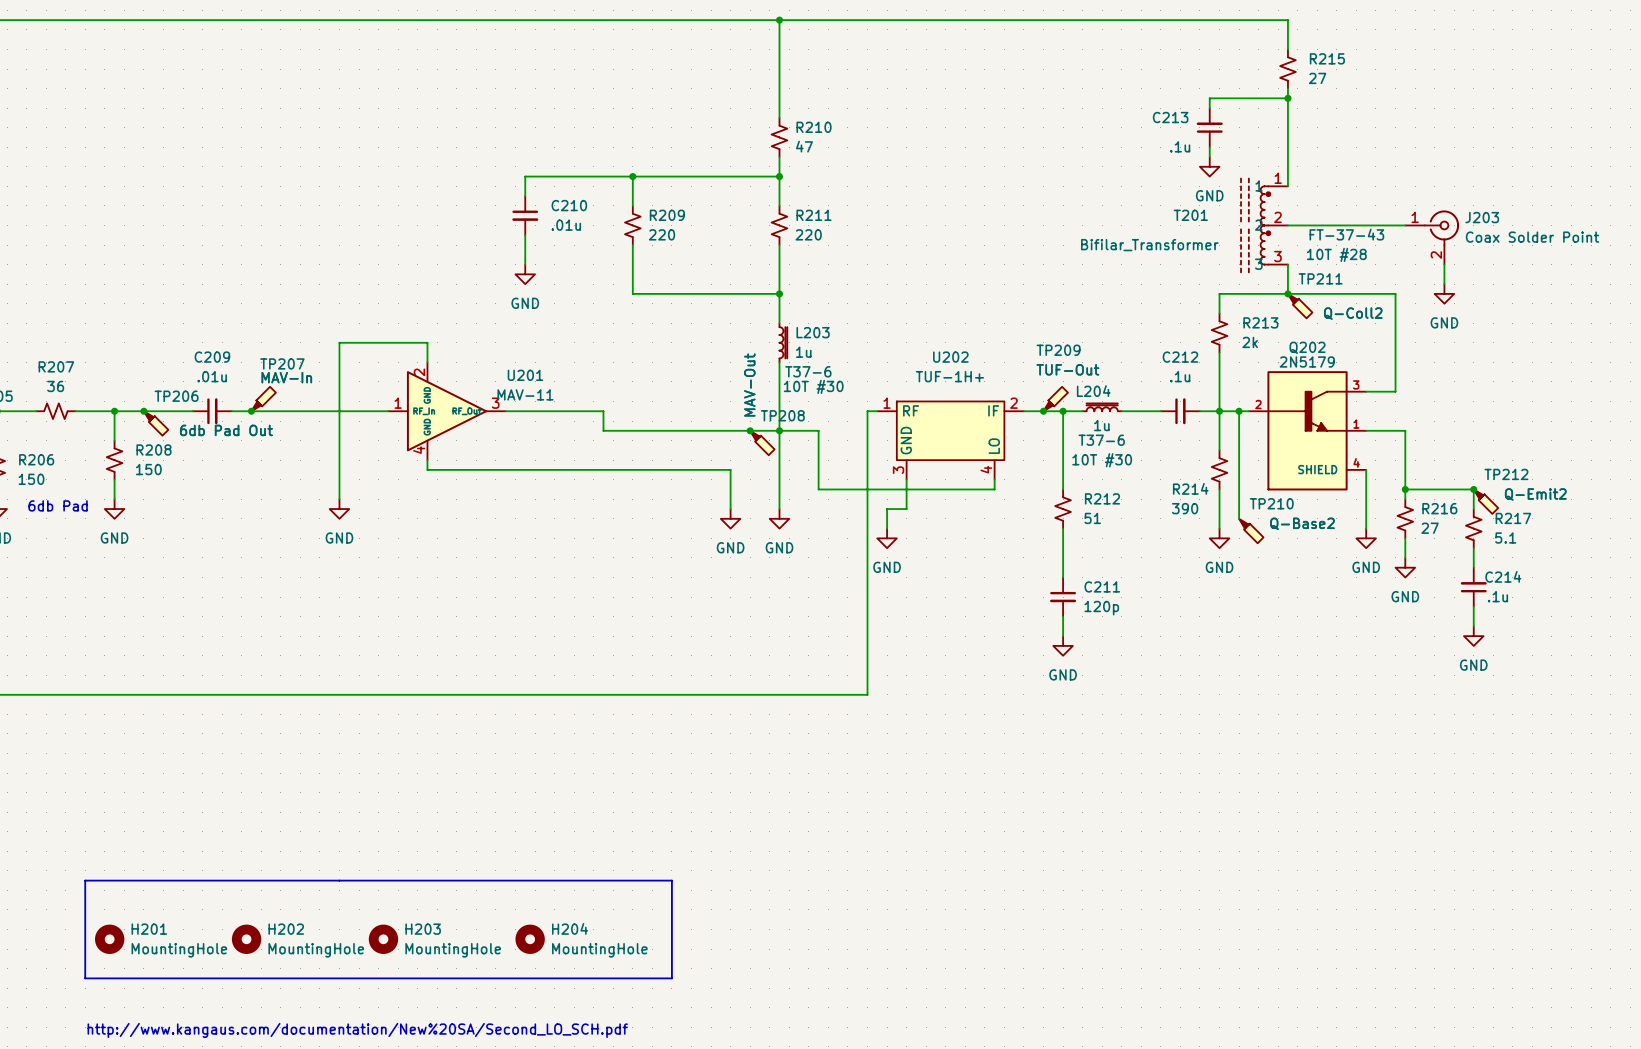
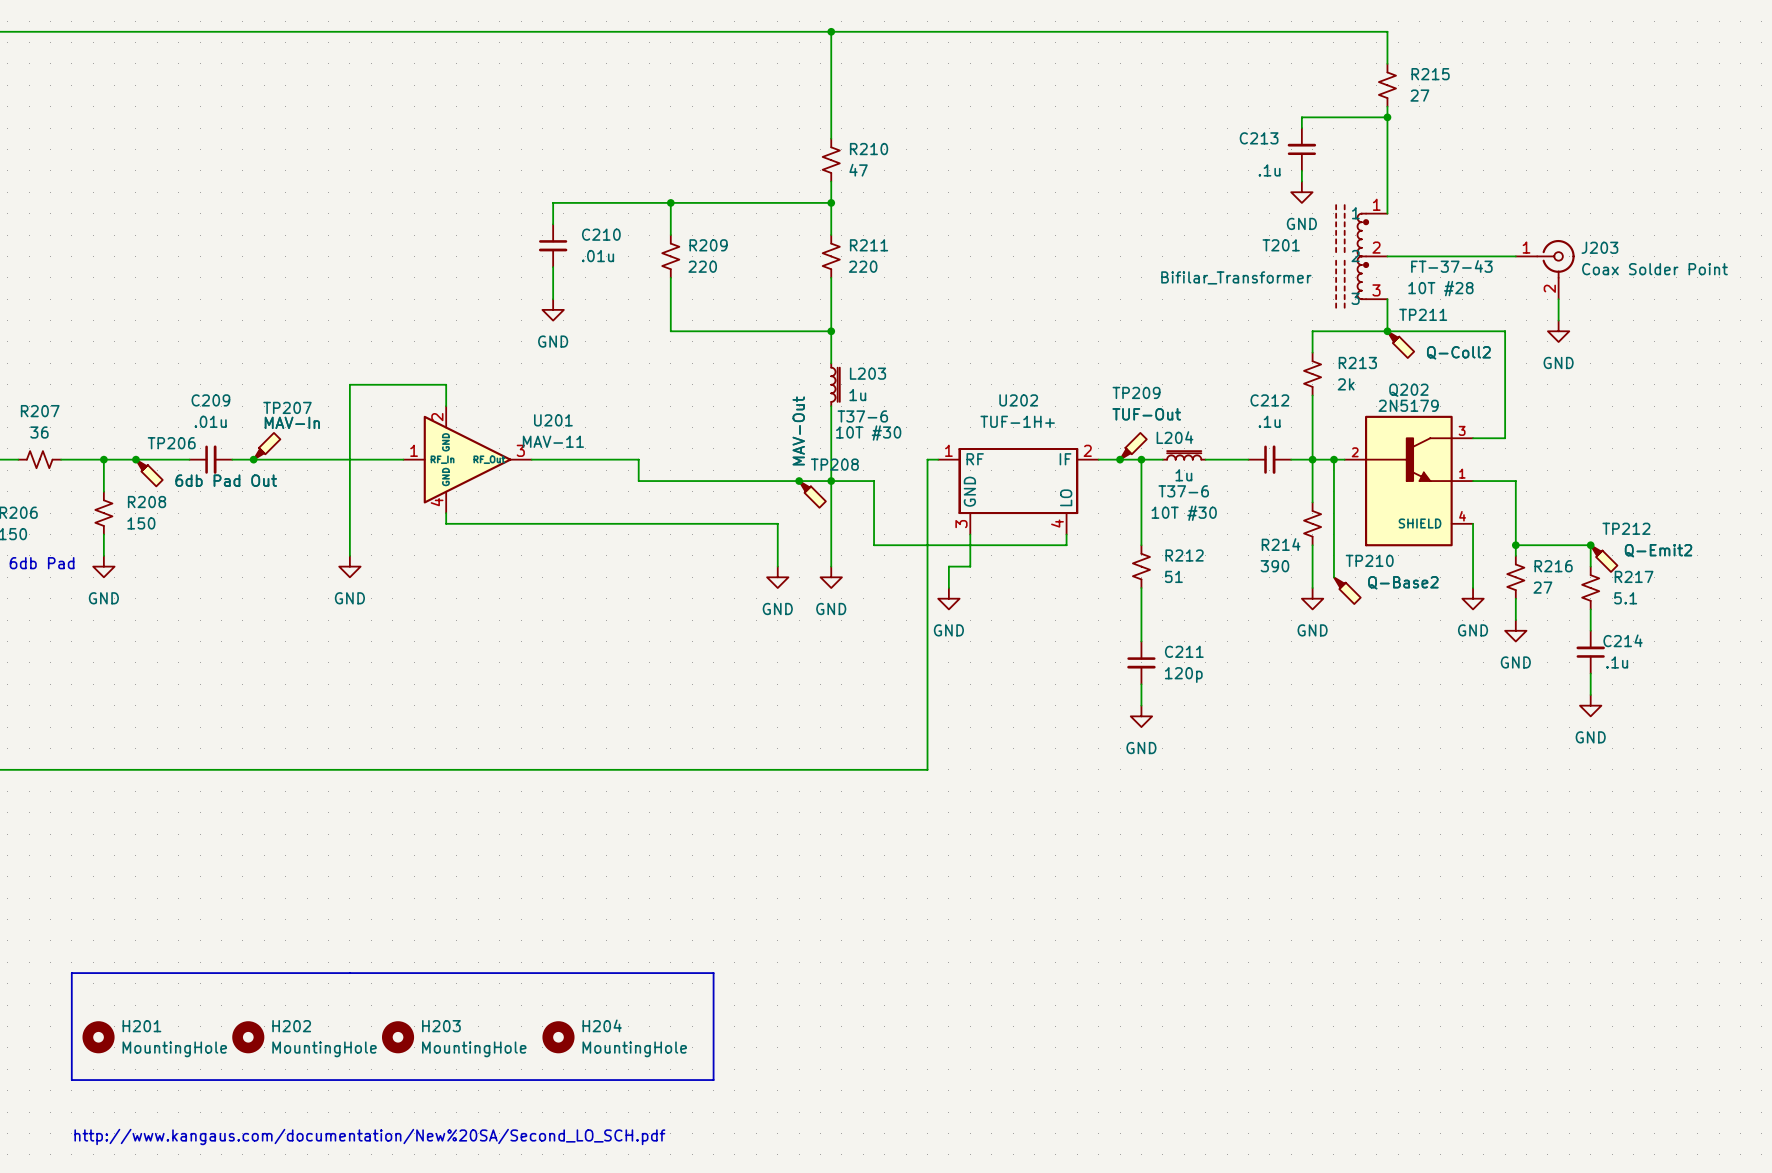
U202 symbol: [877, 401, 1024, 480] -> [938, 448, 1099, 535]

